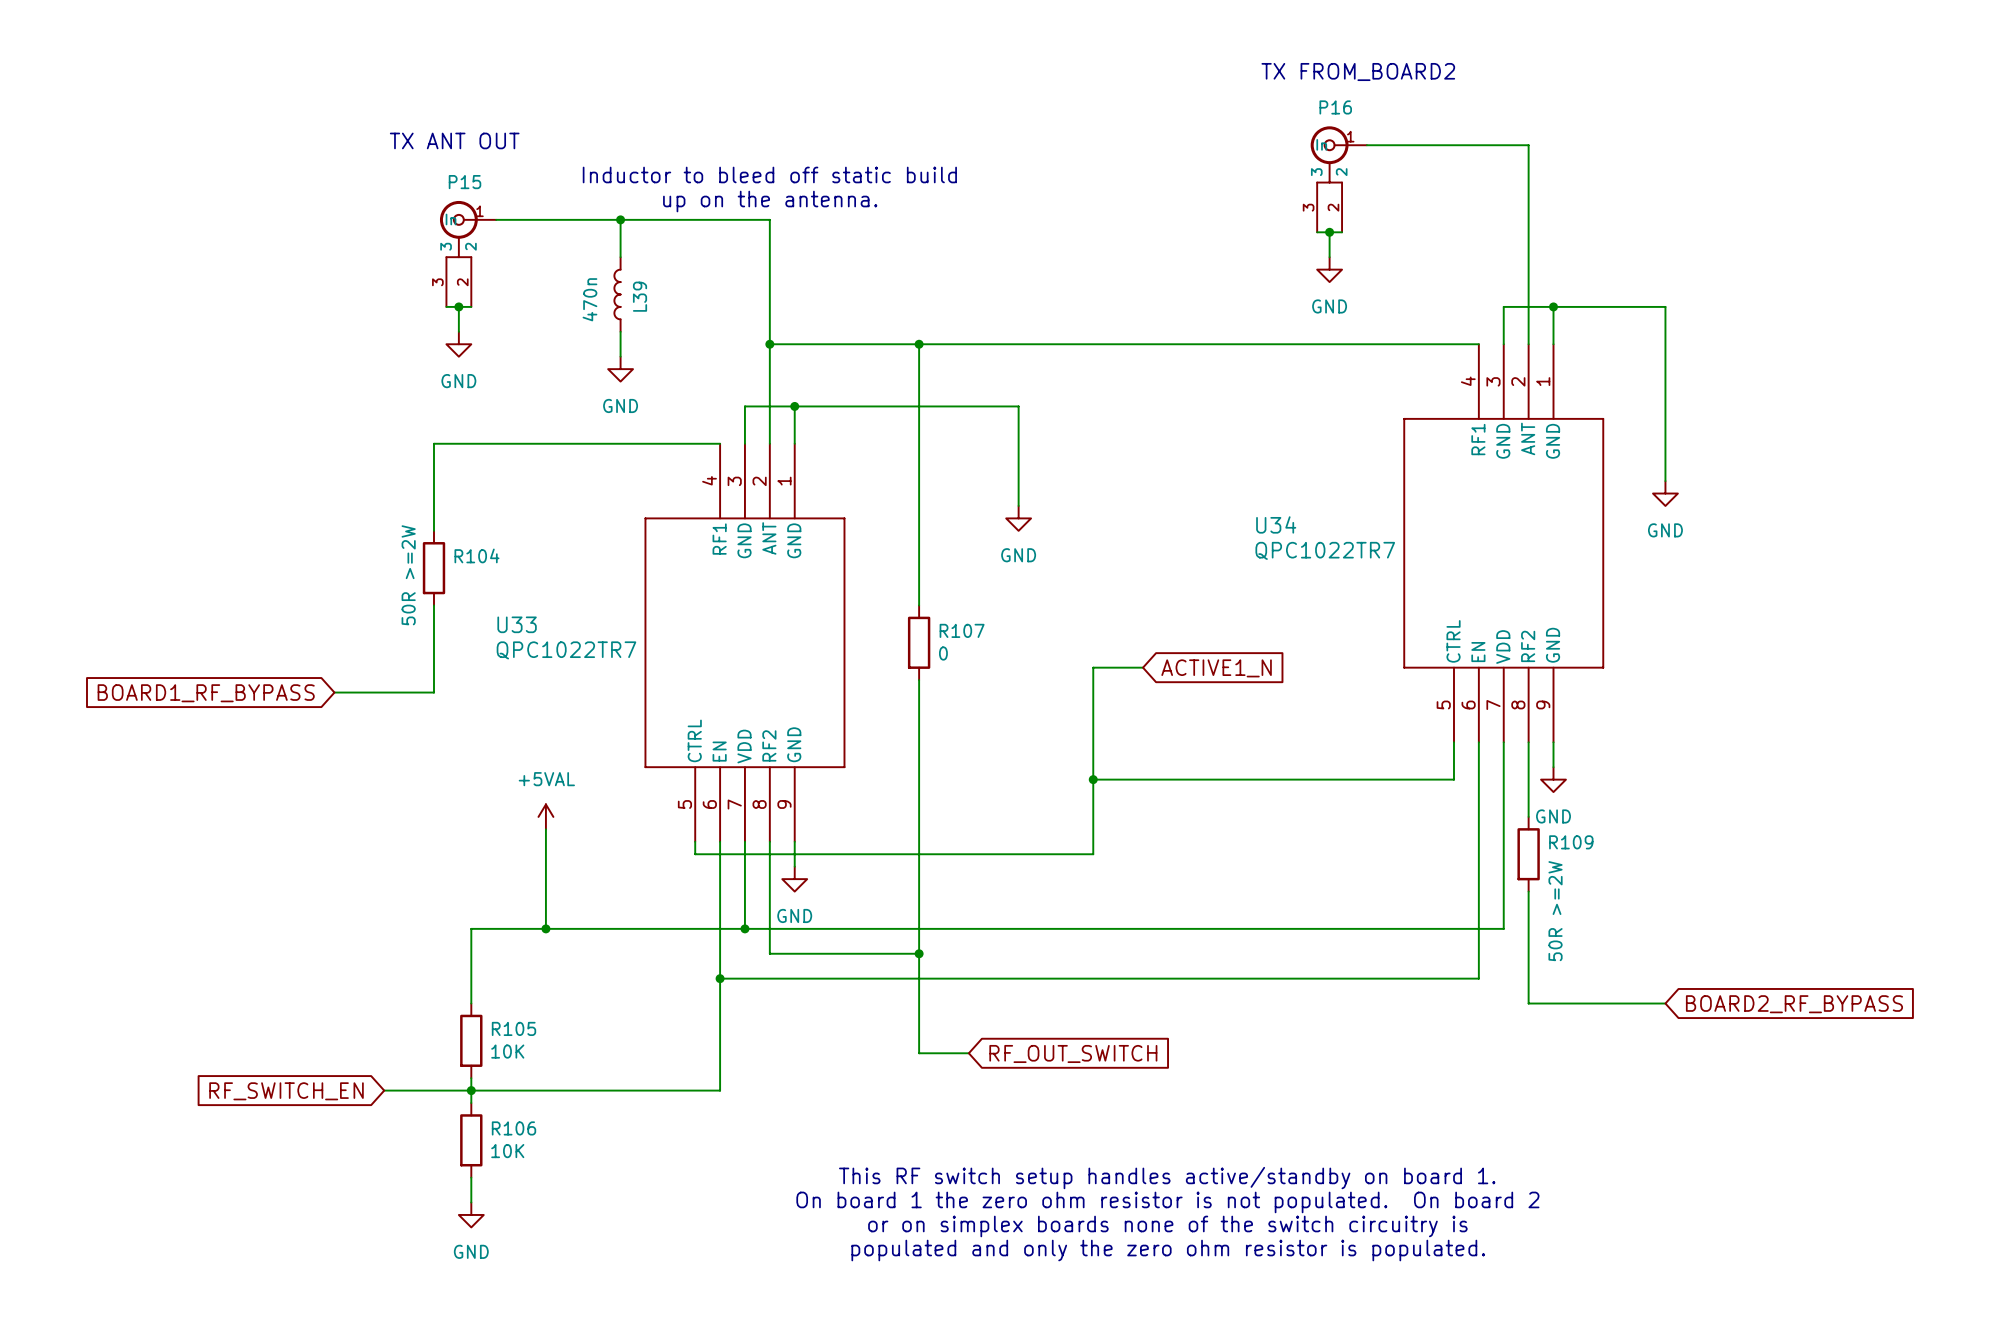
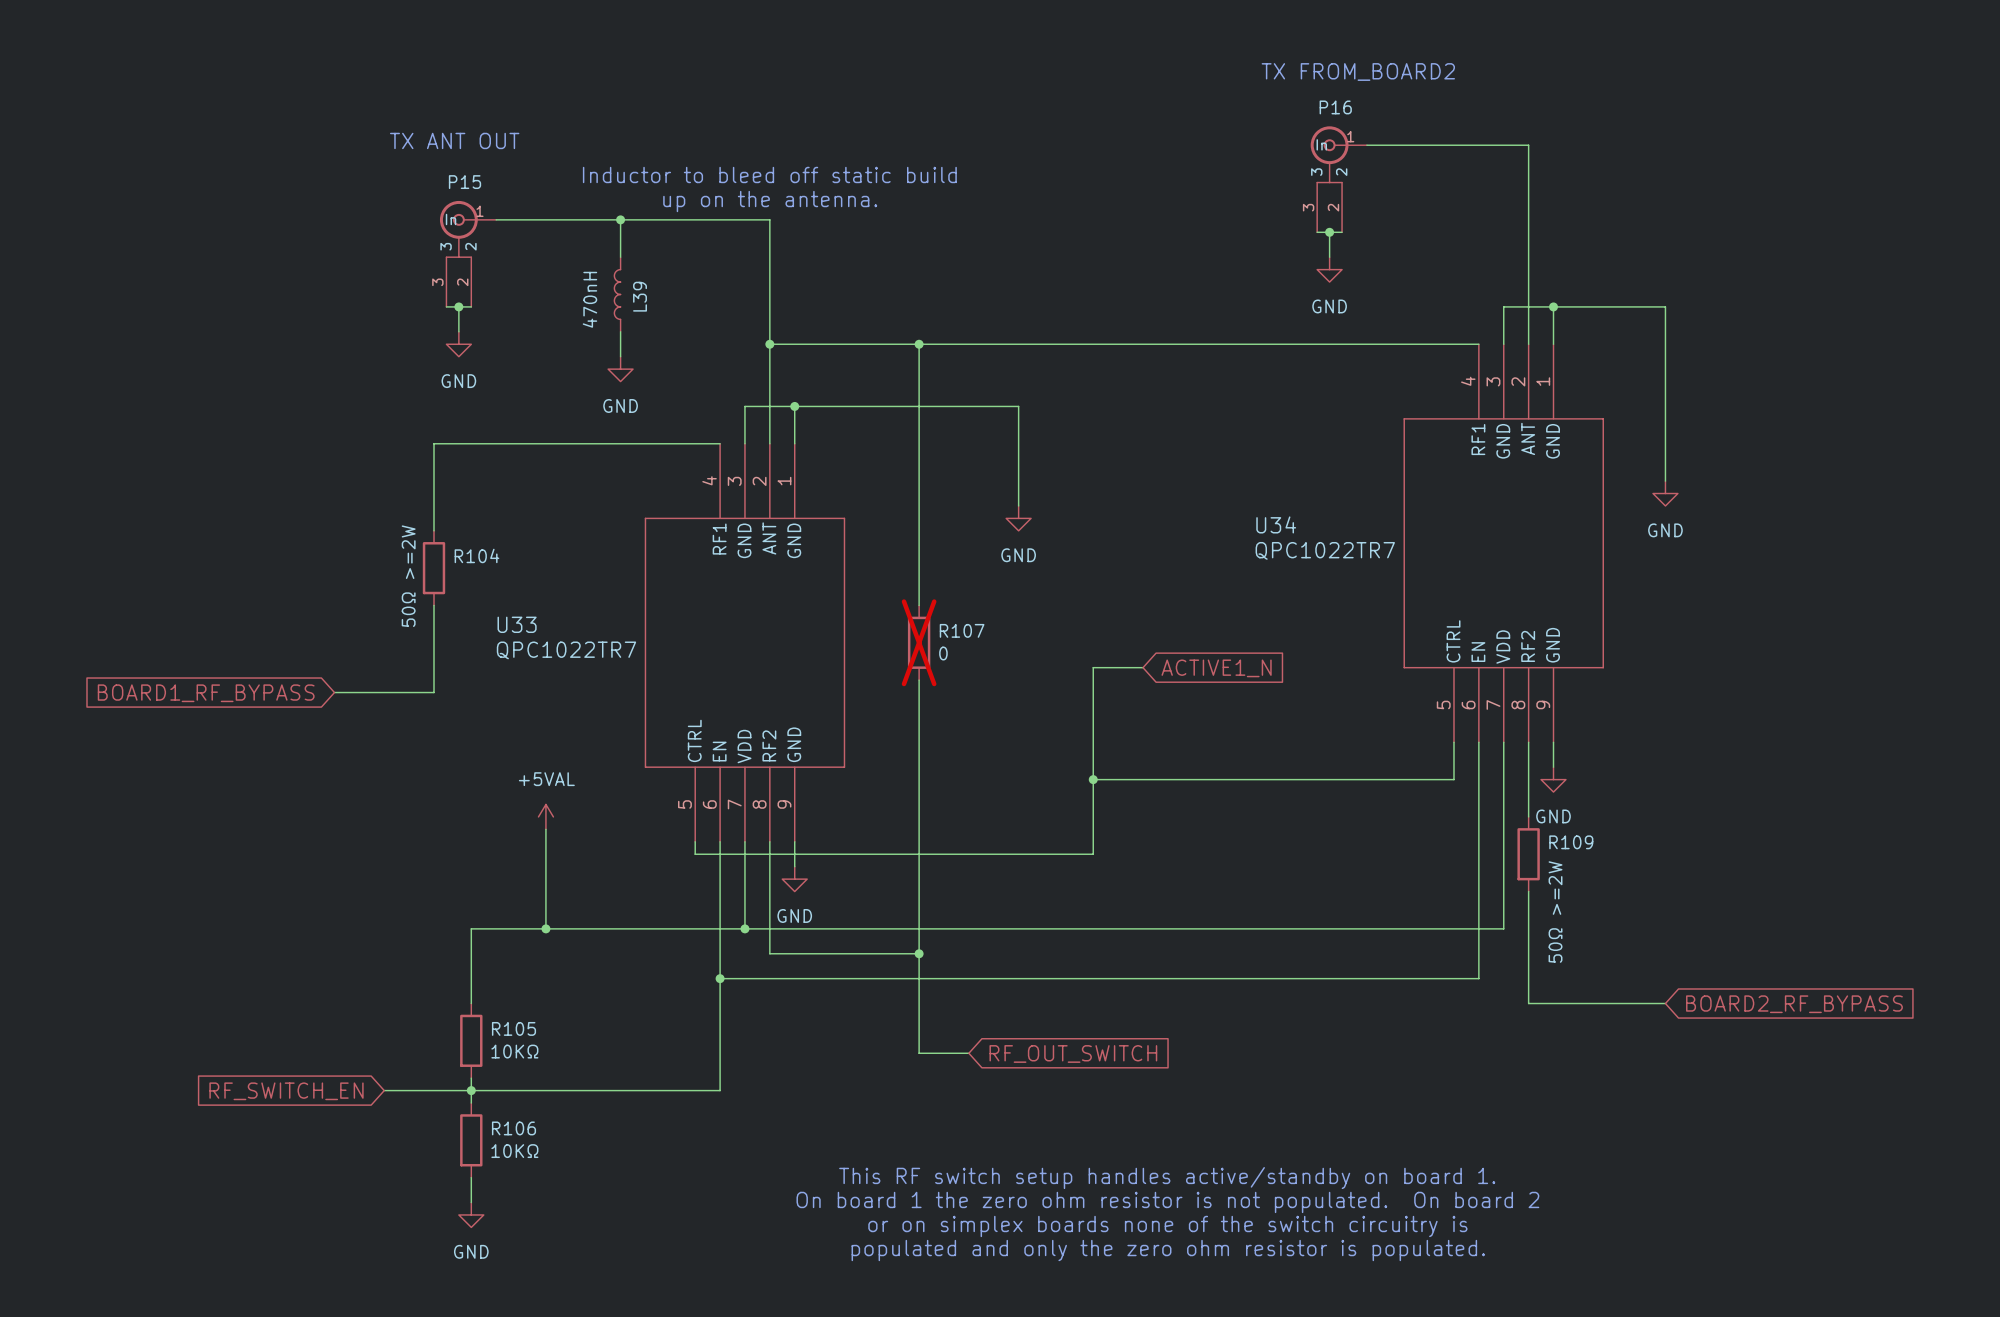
L39 value: 470n (589, 299) -> 470nH (589, 299)
R104 value: 50R >=2W (408, 575) -> 50Ω >=2W (408, 576)
R107 do-not-place cross: none -> (919, 642)
R109 value: 50R >=2W (1555, 911) -> 50Ω >=2W (1555, 912)
R105 value: 10K (507, 1051) -> 10KΩ (514, 1051)
R106 value: 10K (507, 1151) -> 10KΩ (514, 1151)

